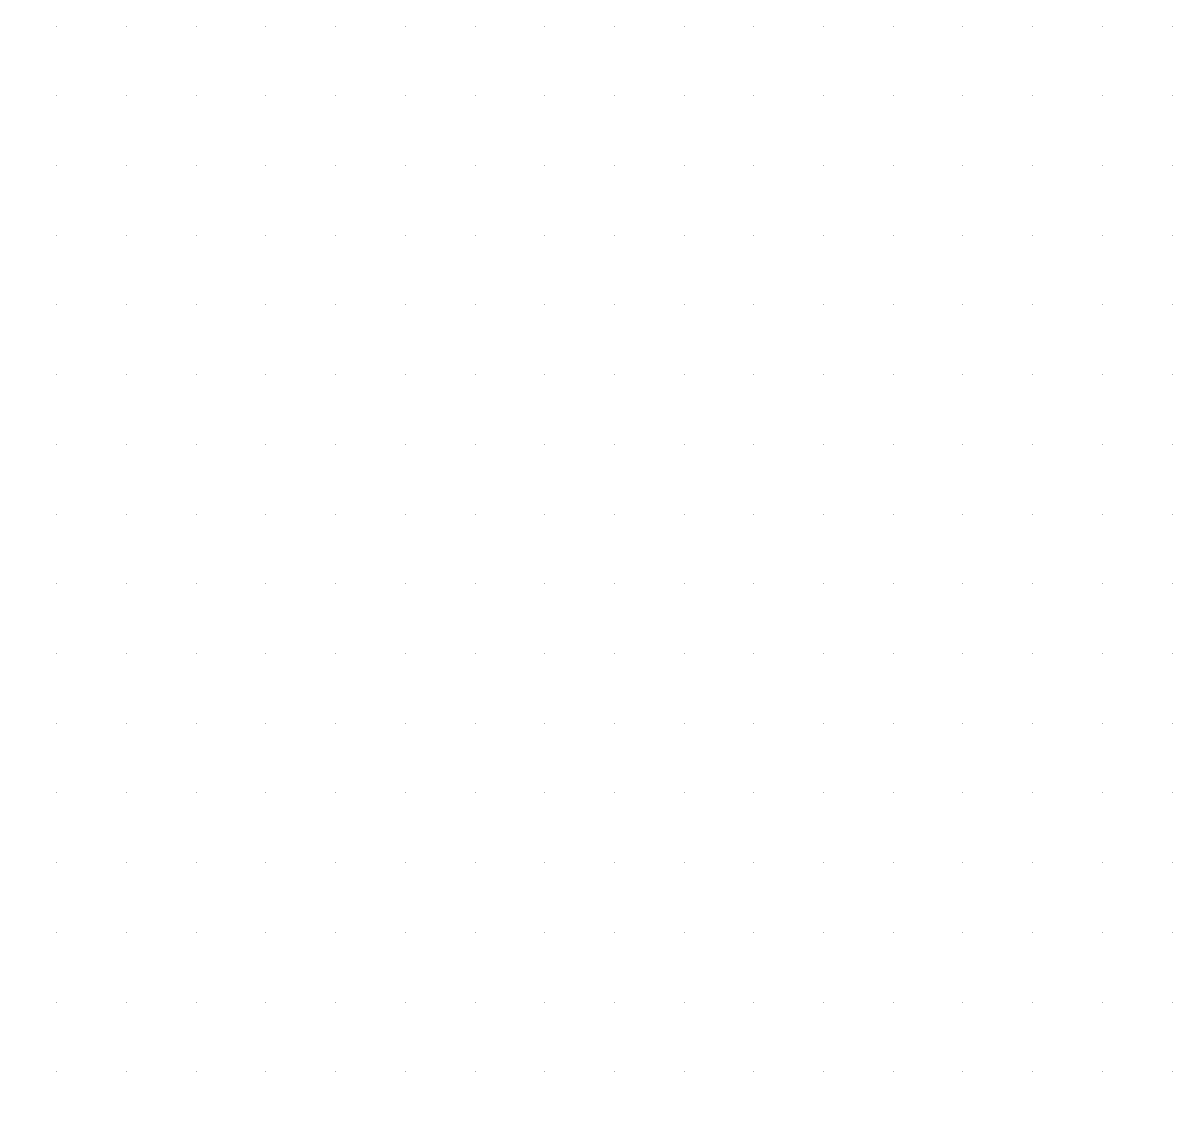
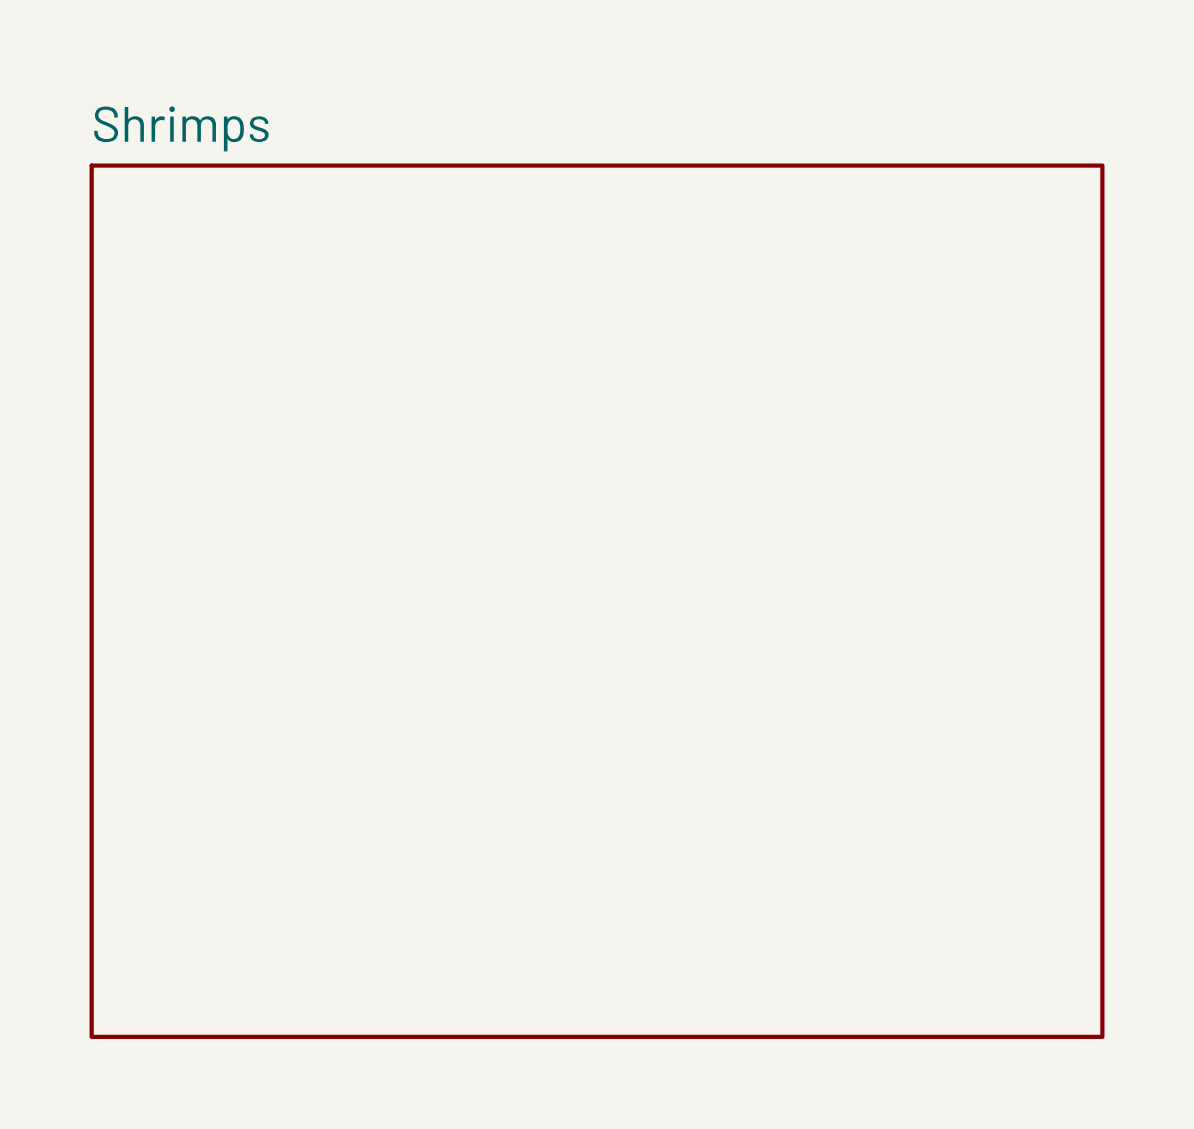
sheet Shrimps: none -> (597, 601)

